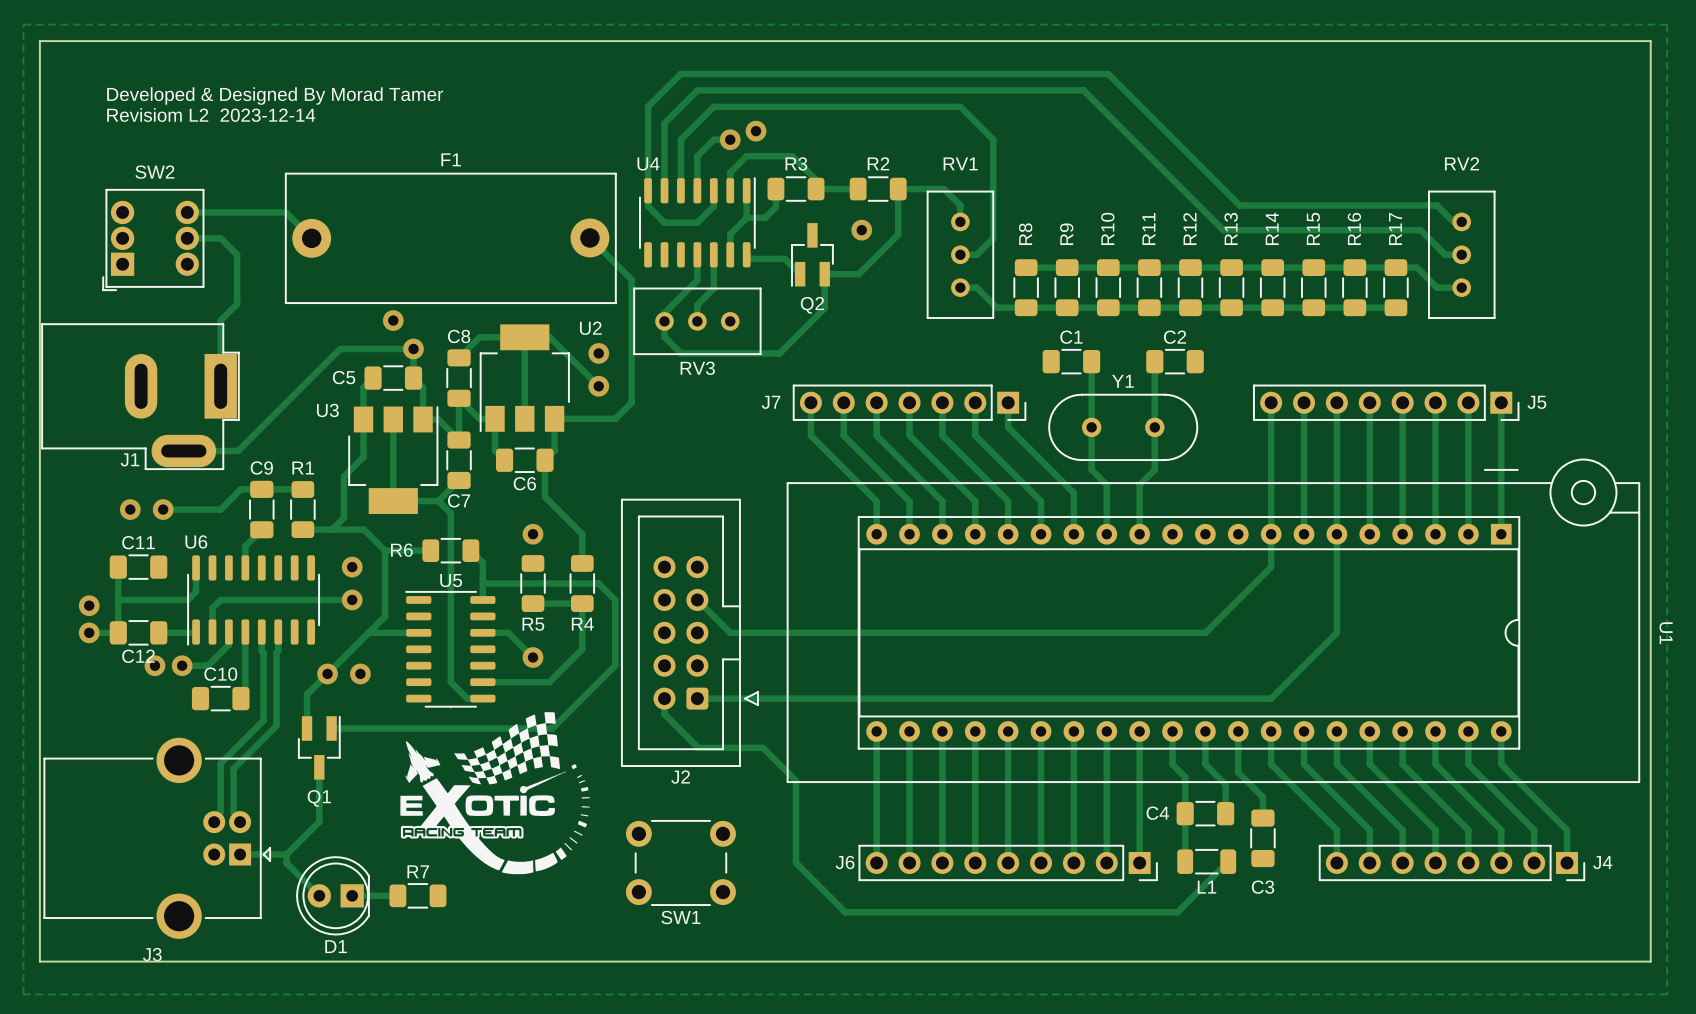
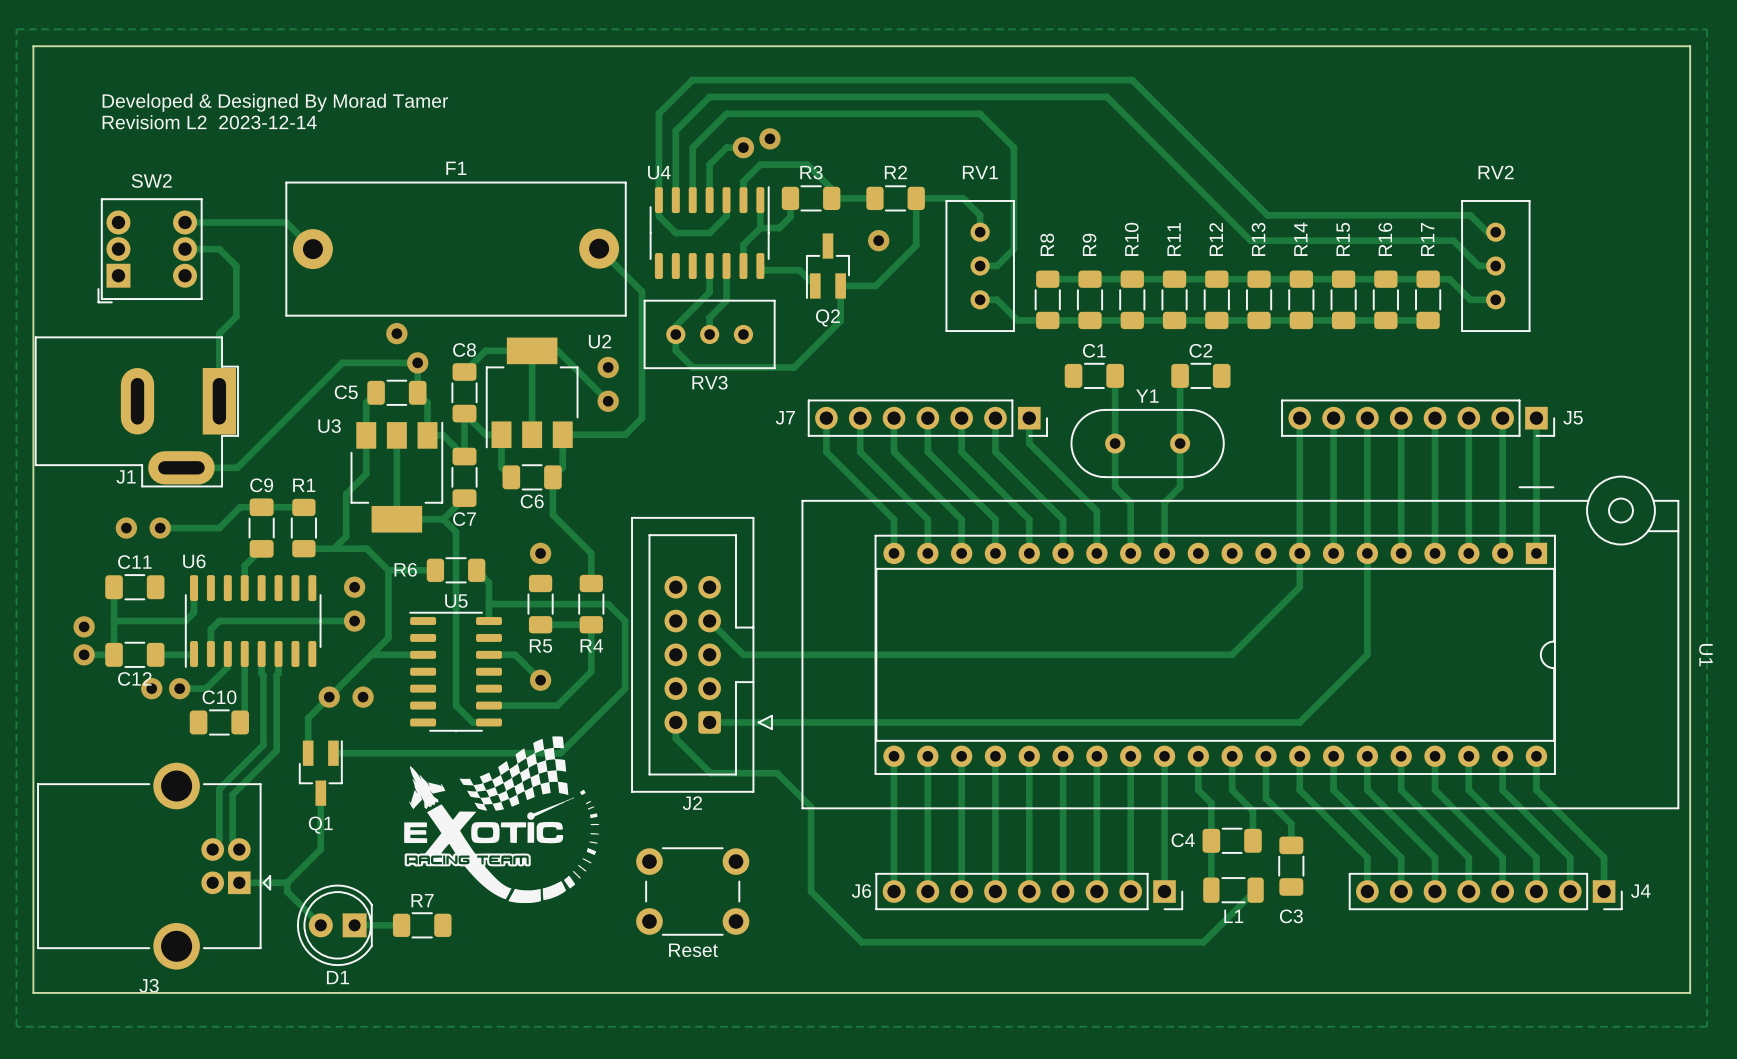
SW1 name: SW1 (680, 917) -> none
SW1 text: none -> Reset (693, 950)

